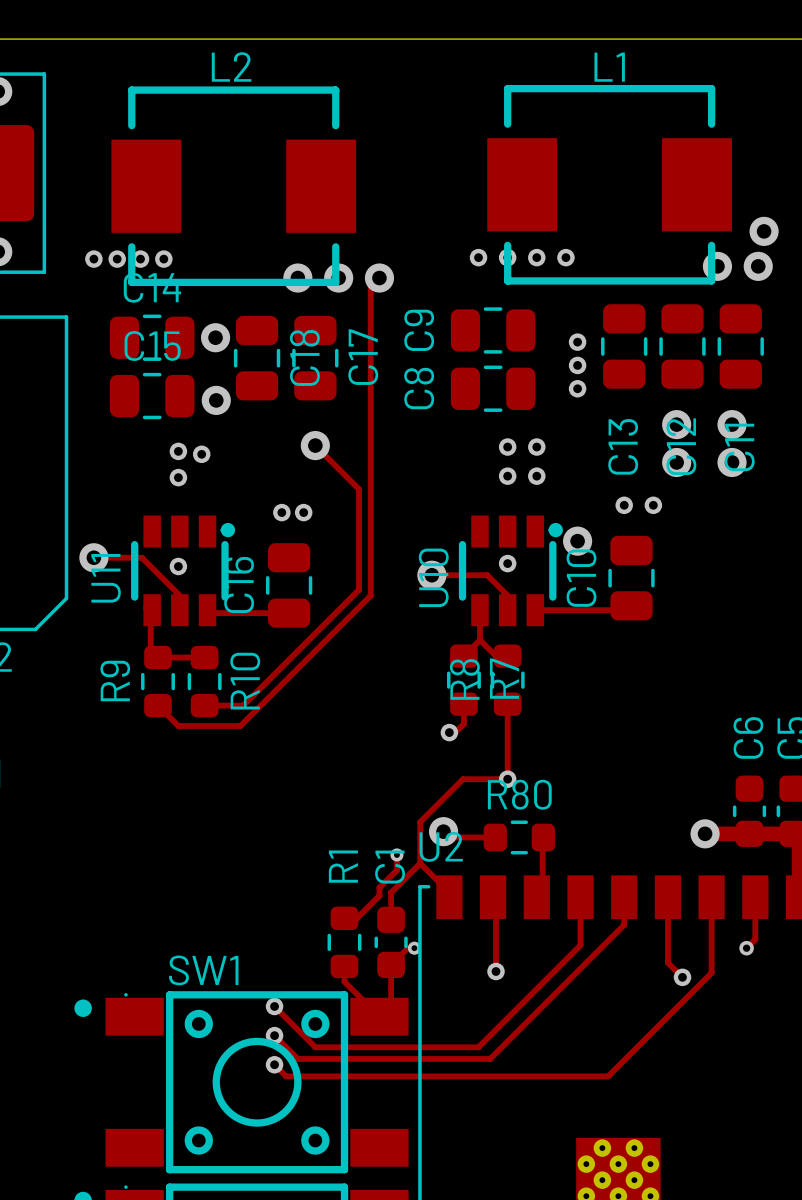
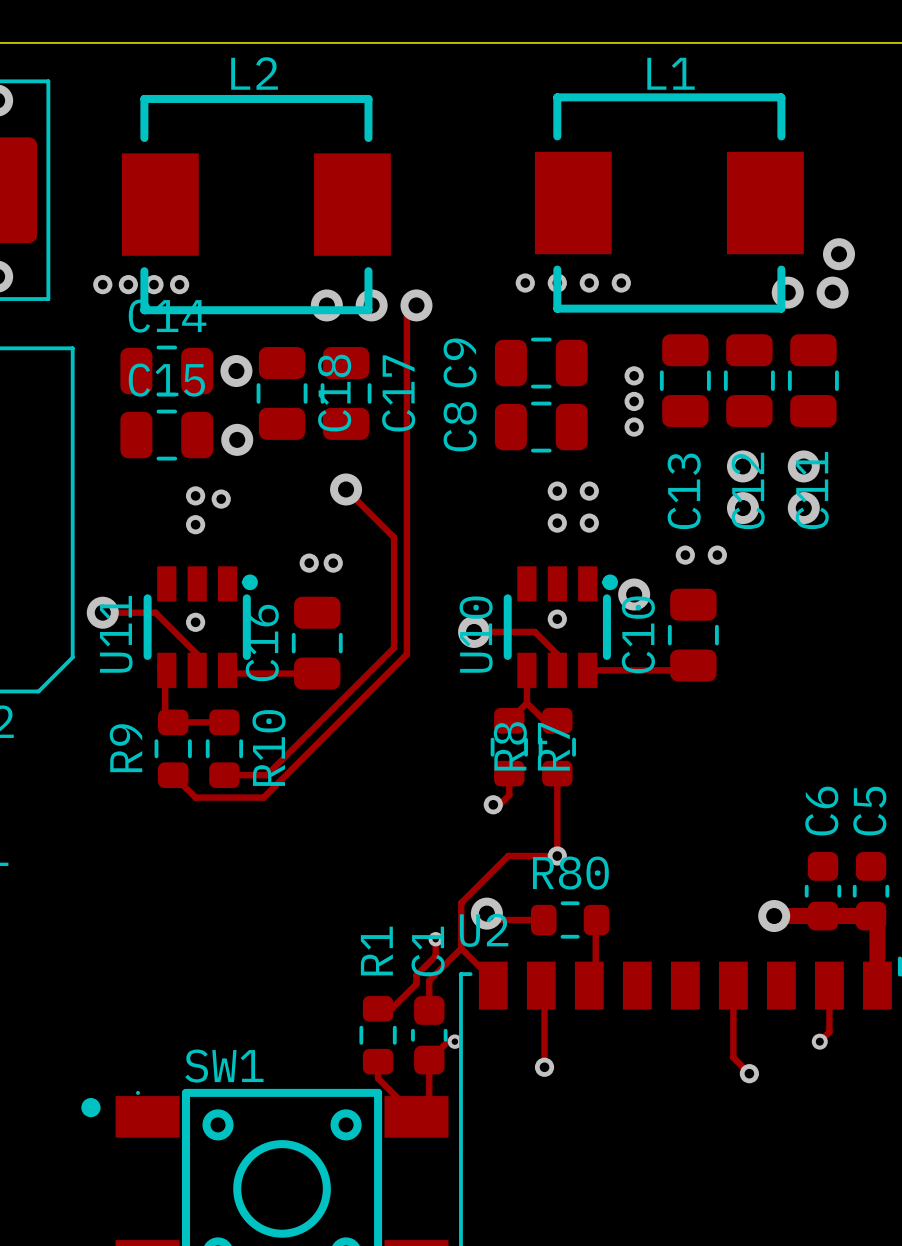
track: (580, 897) (580, 945) (478, 1047) (315, 1047) (274, 1006) -> none
track: (624, 897) (624, 924) (490, 1058) (297, 1058) (274, 1035) -> none
track: (711, 897) (711, 972) (608, 1076) (286, 1076) (274, 1064) -> none
via: (274, 1006) -> none
via: (274, 1035) -> none
via: (274, 1064) -> none

